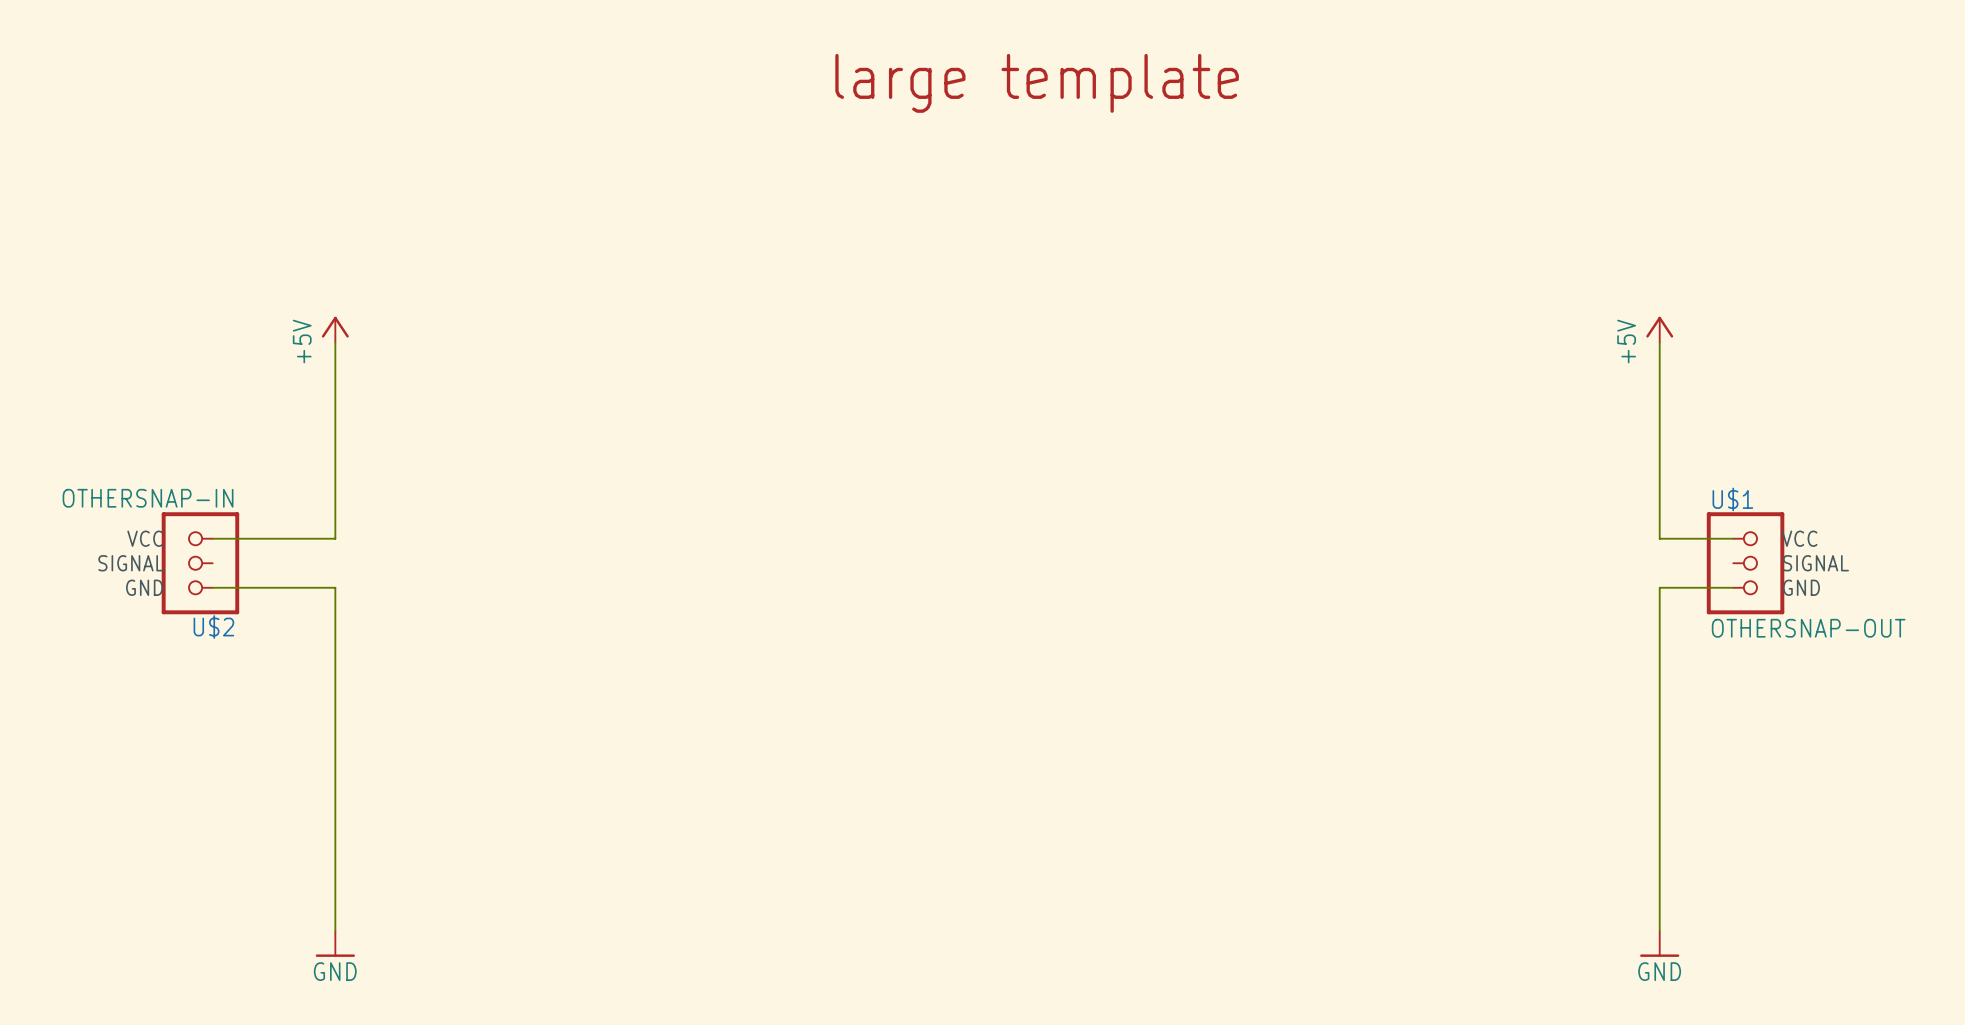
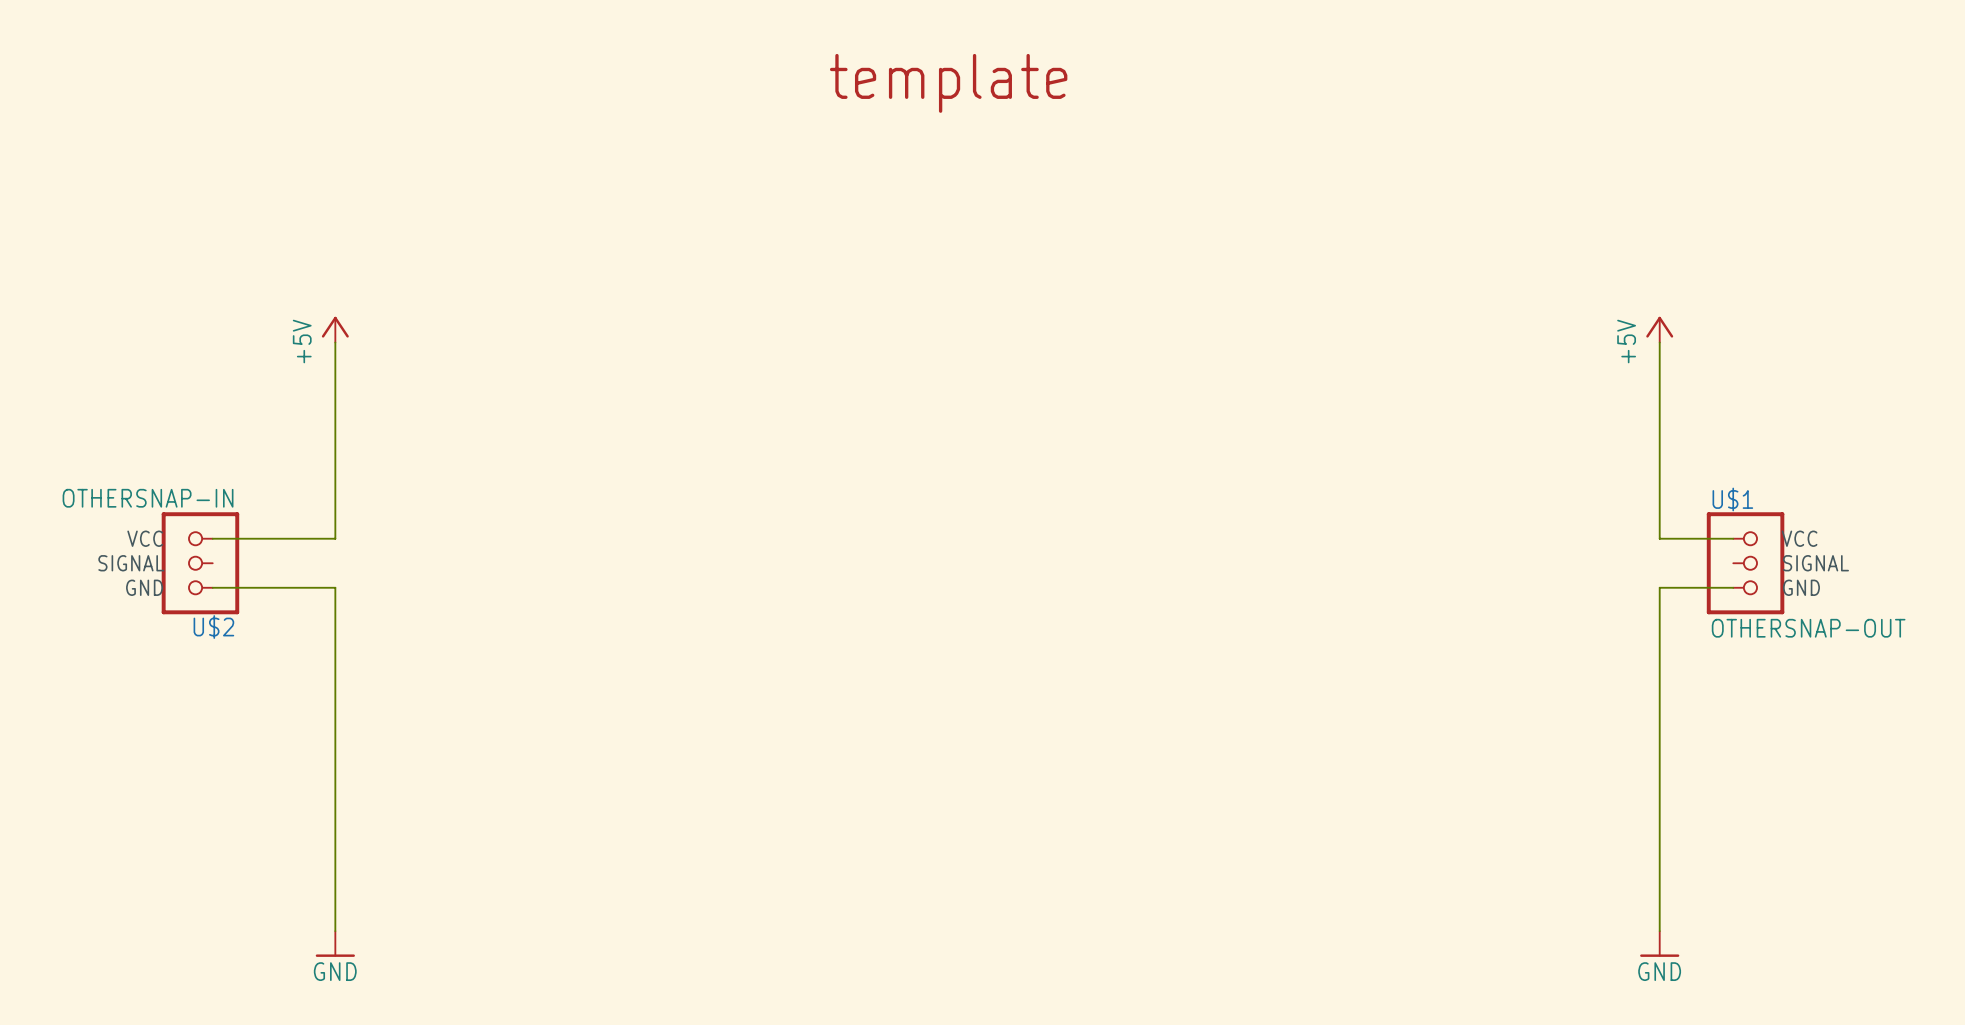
text: large template (1037, 83) -> template (948, 83)

